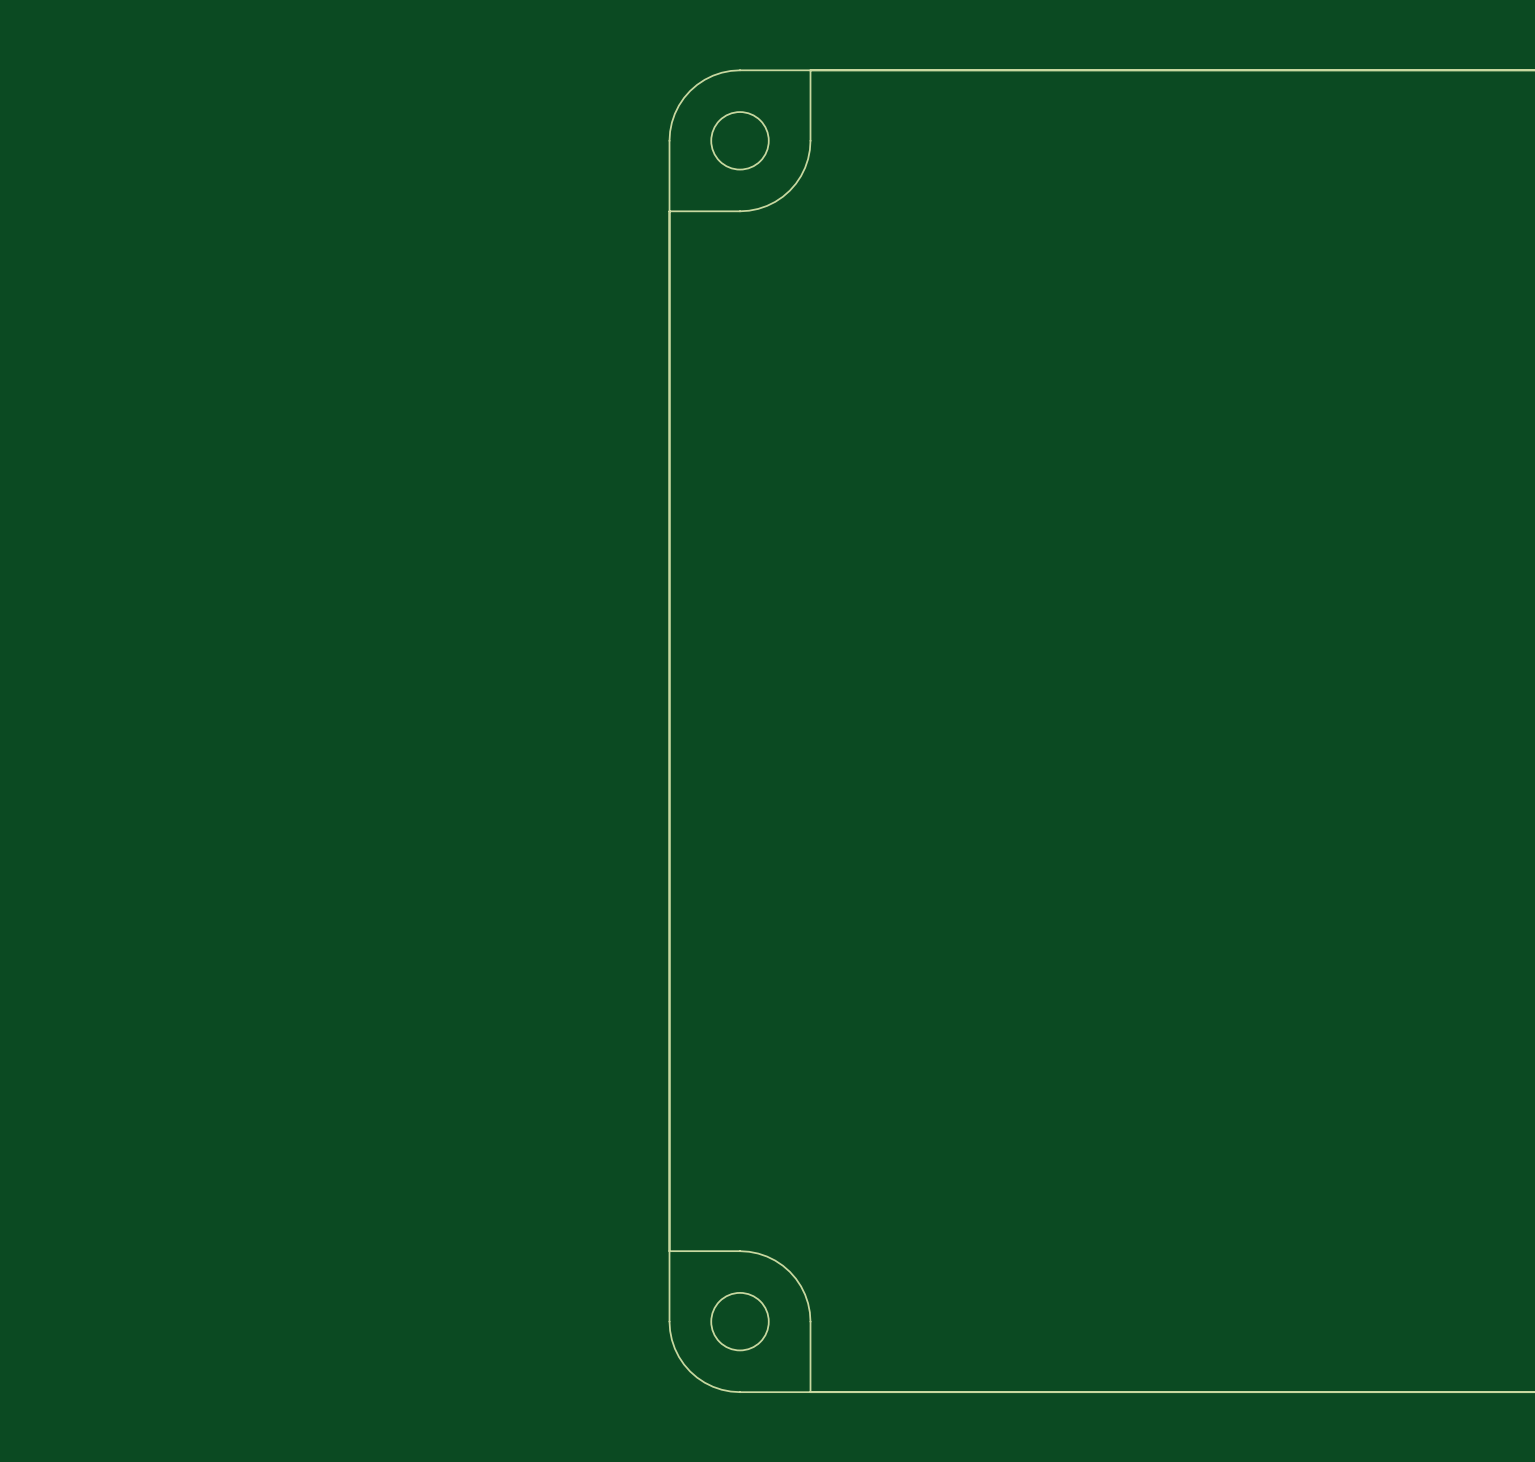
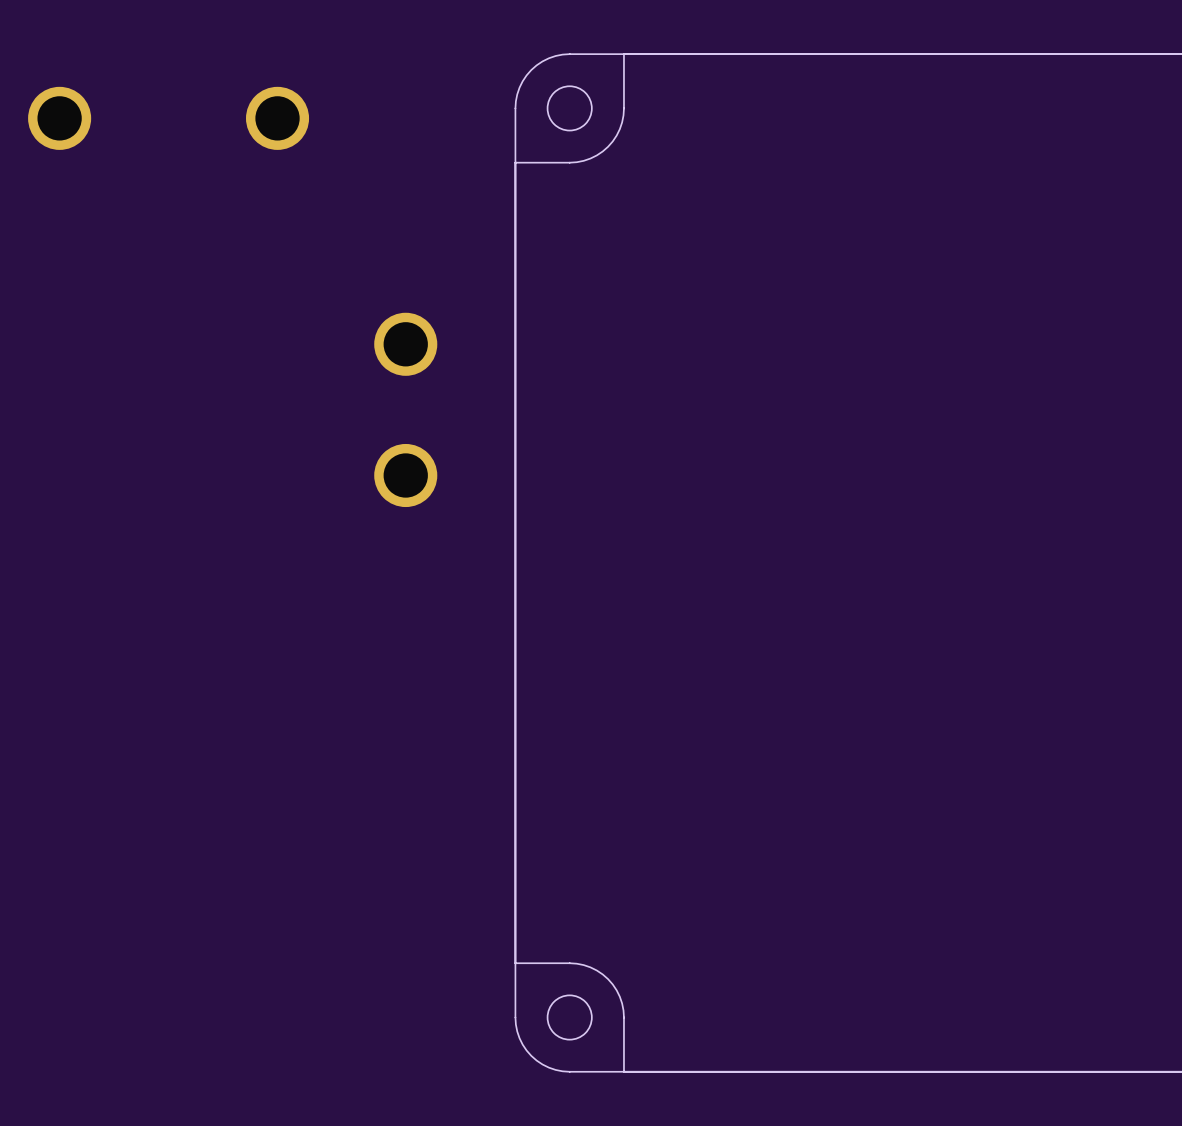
part: none -> (59, 118)
part: none -> (277, 118)
part: none -> (405, 344)
part: none -> (405, 475)

